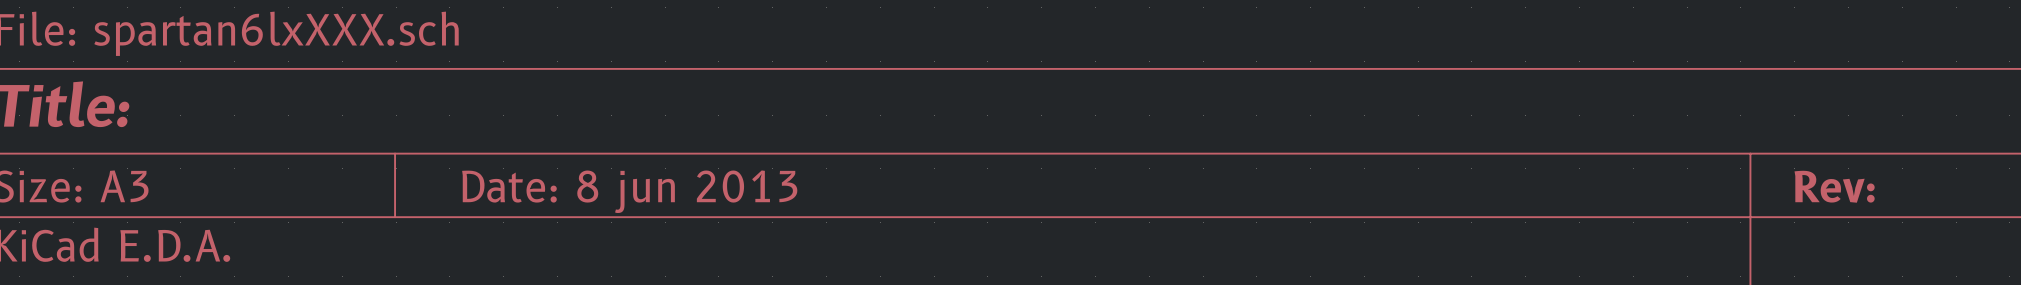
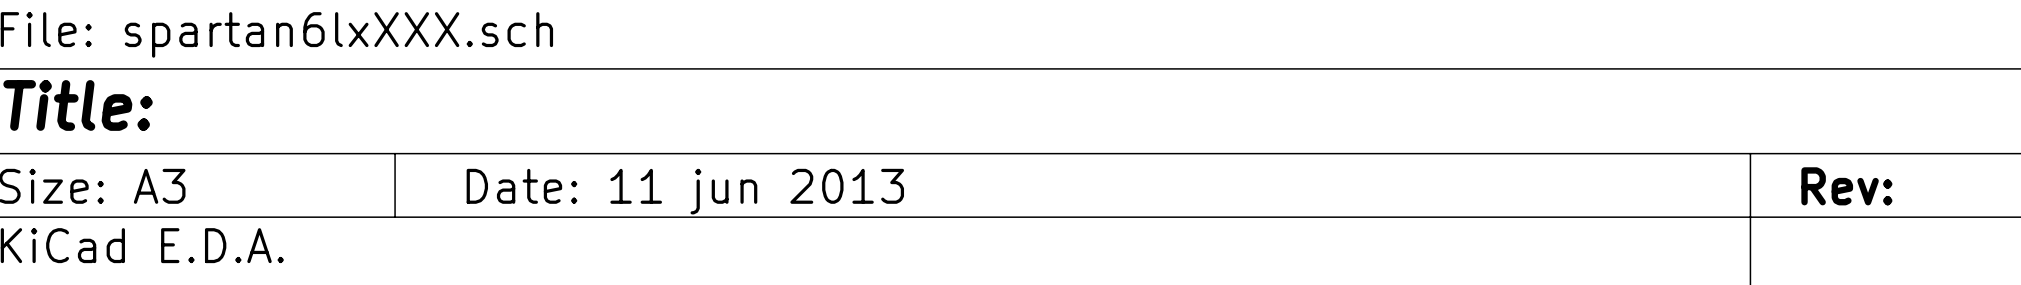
title block: Date: 8 jun 2013 (629, 191) -> Date: 11 jun 2013 (685, 191)

